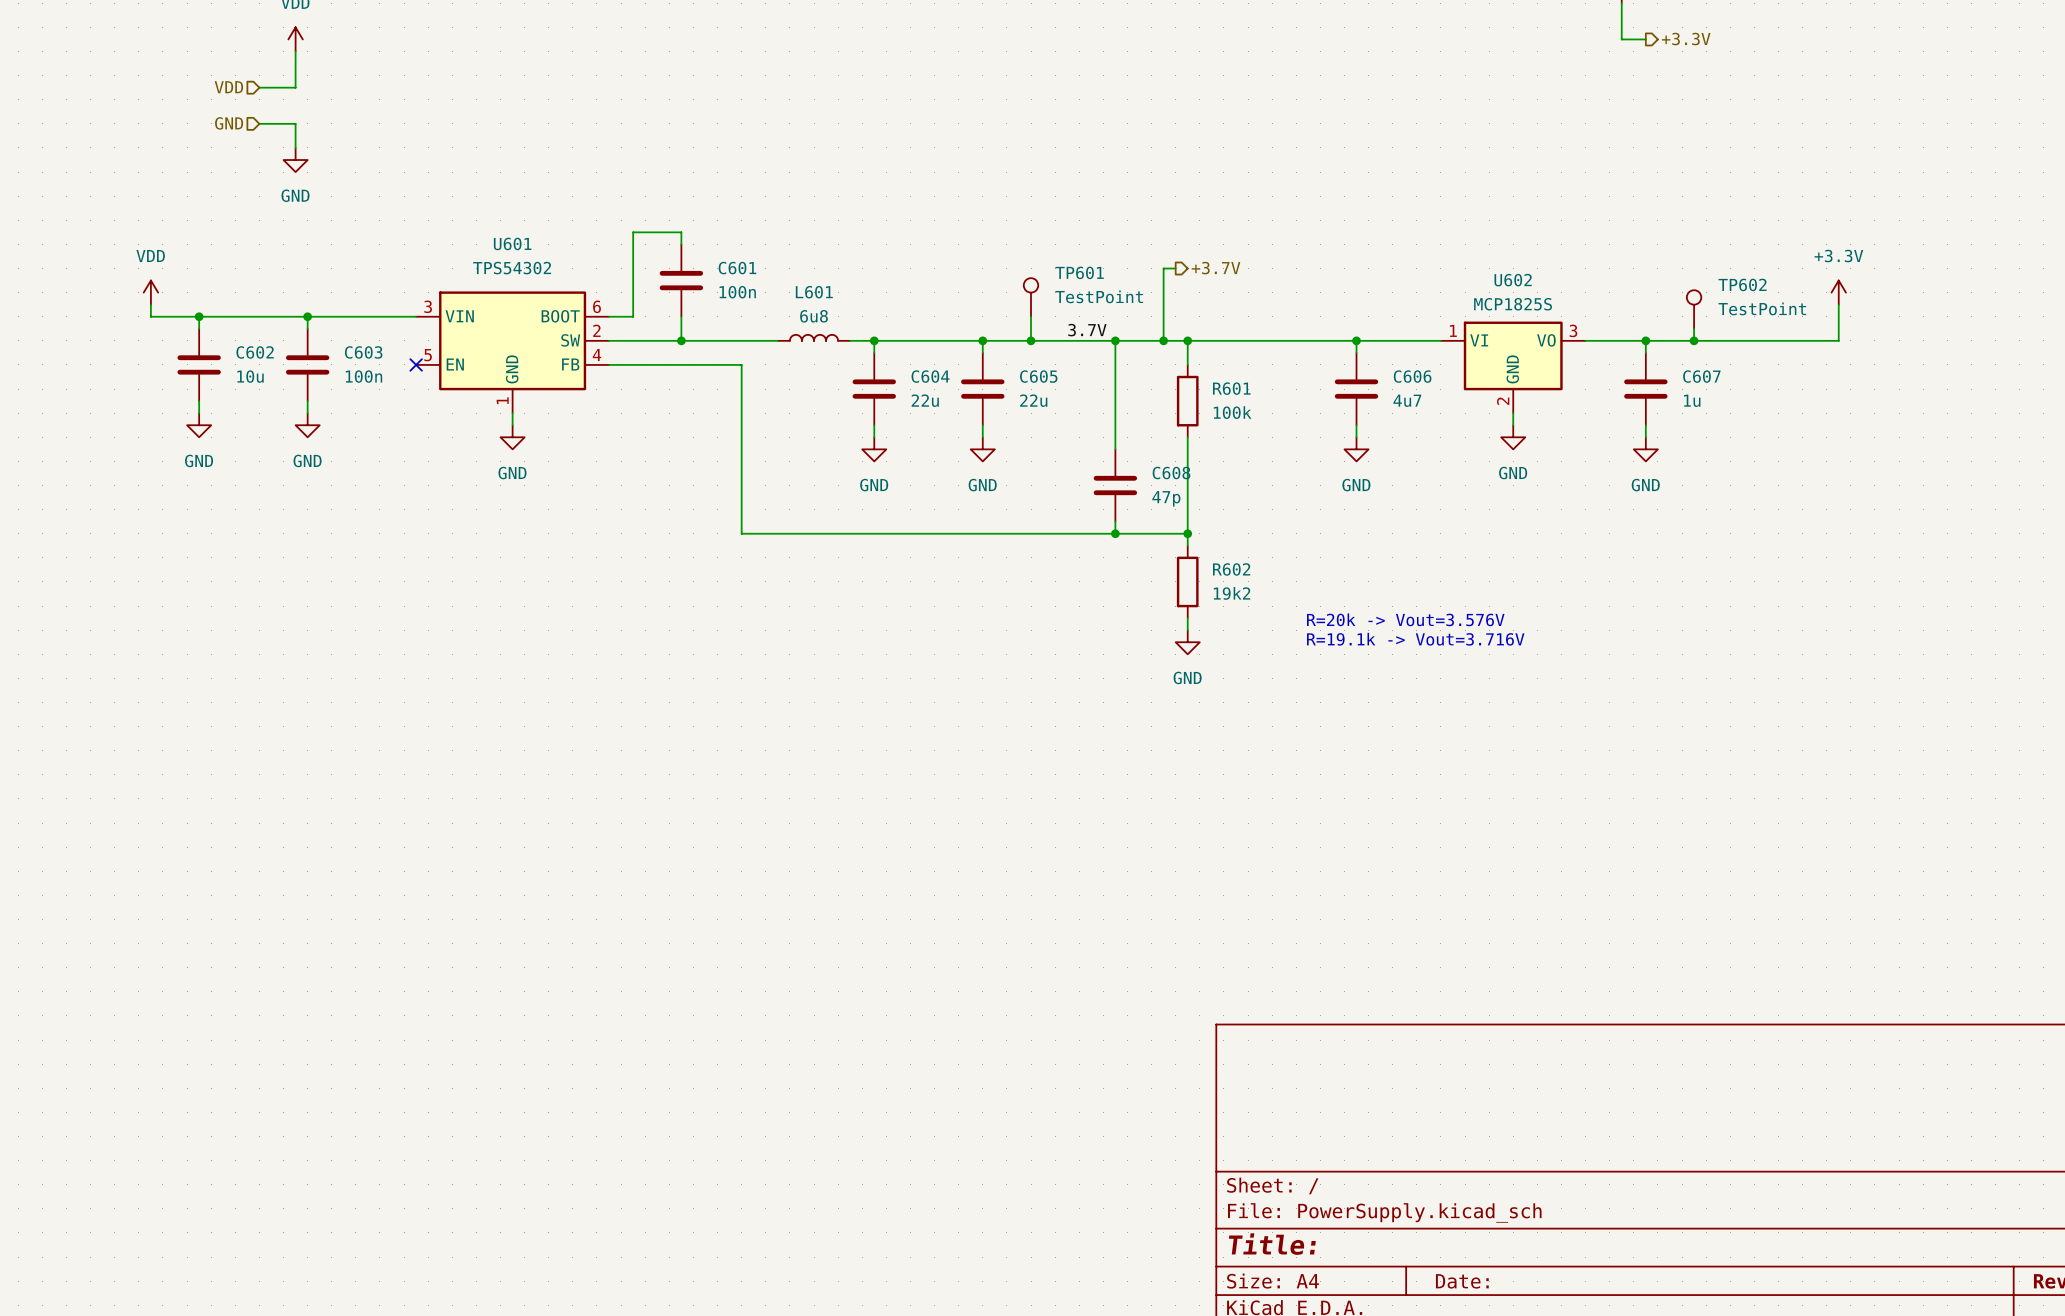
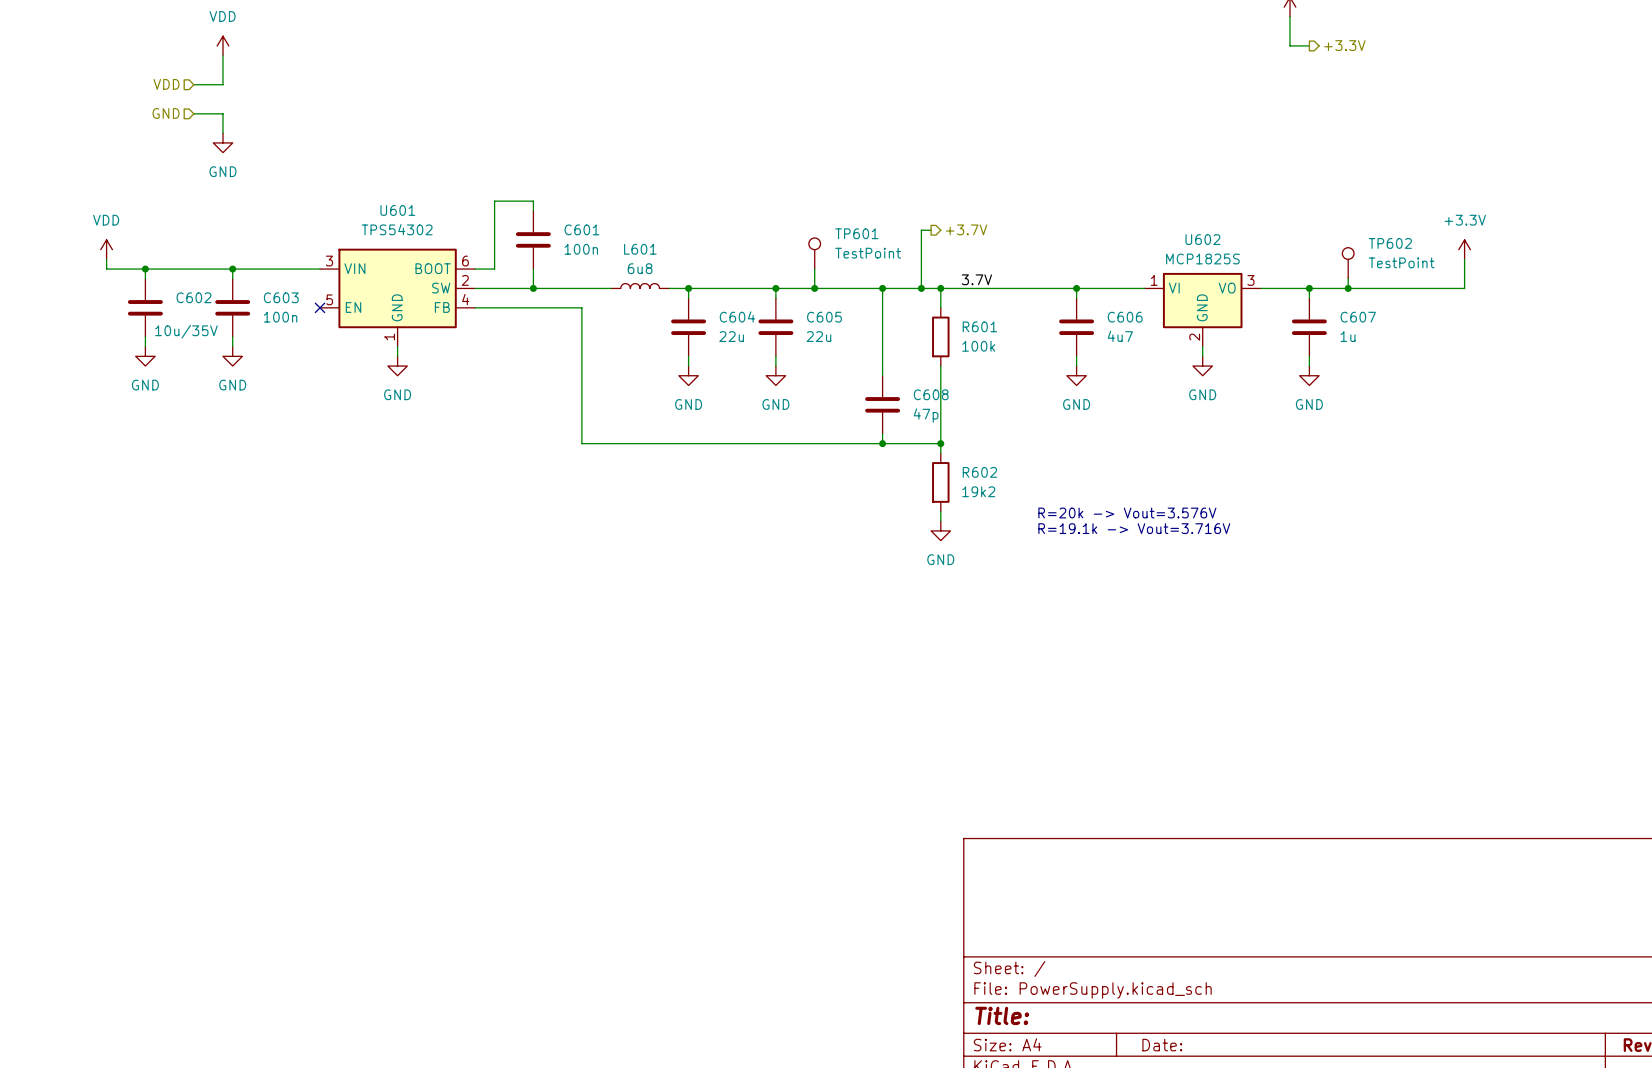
label position: 3.7V (1087, 330) -> 3.7V (976, 279)
C602 value: 10u (250, 376) -> 10u/35V (186, 331)

